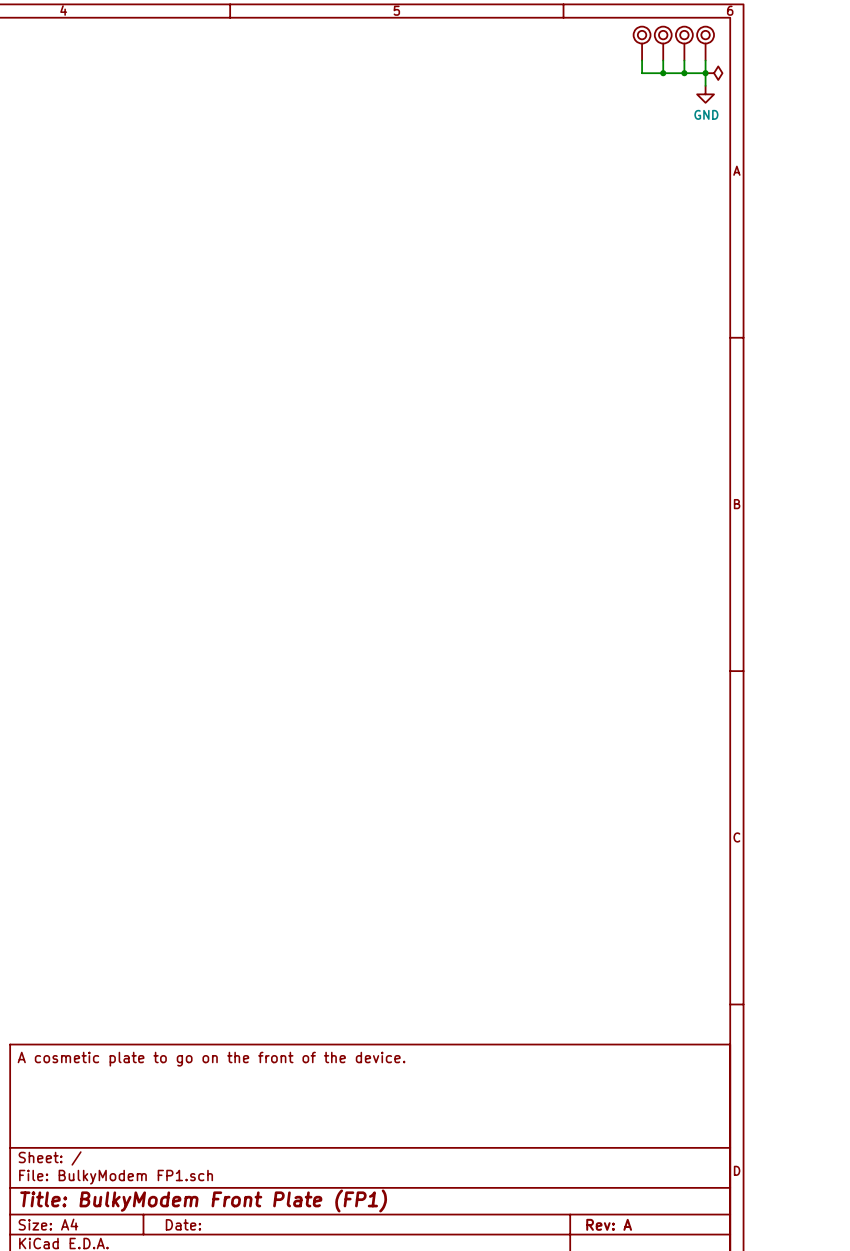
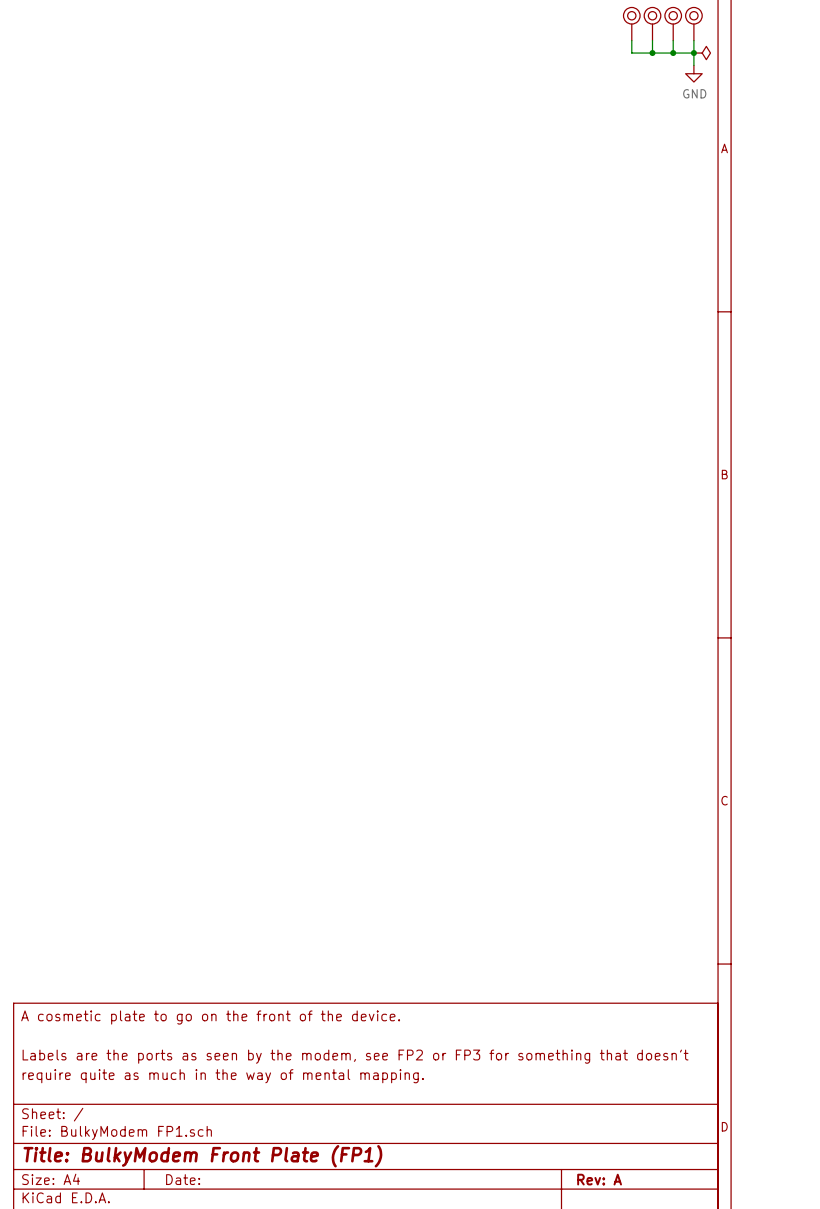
title block: none -> Labels are the ports as seen by the modem, see FP2 or FP3 for something that doesn't (355, 1056)
title block: none -> require quite as much in the way of mental mapping. (223, 1076)

